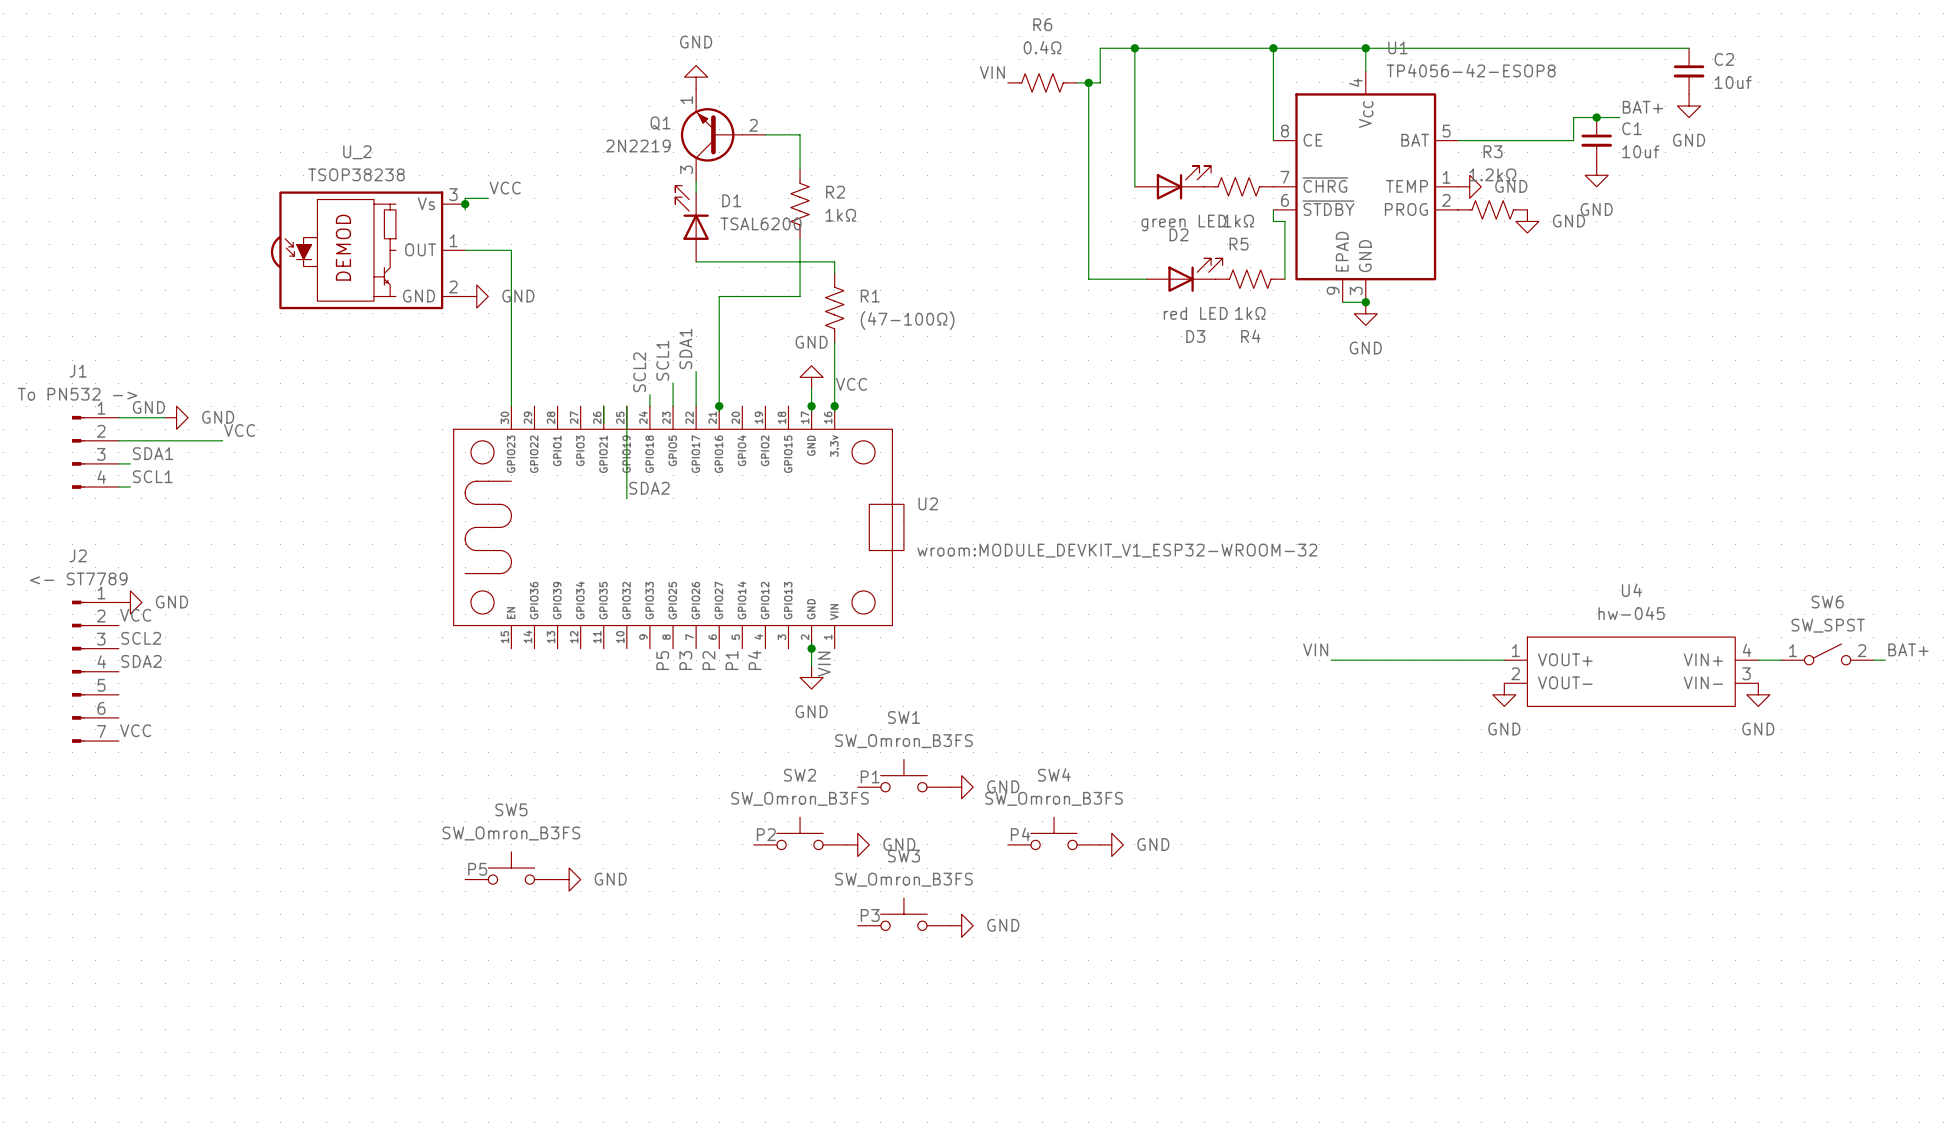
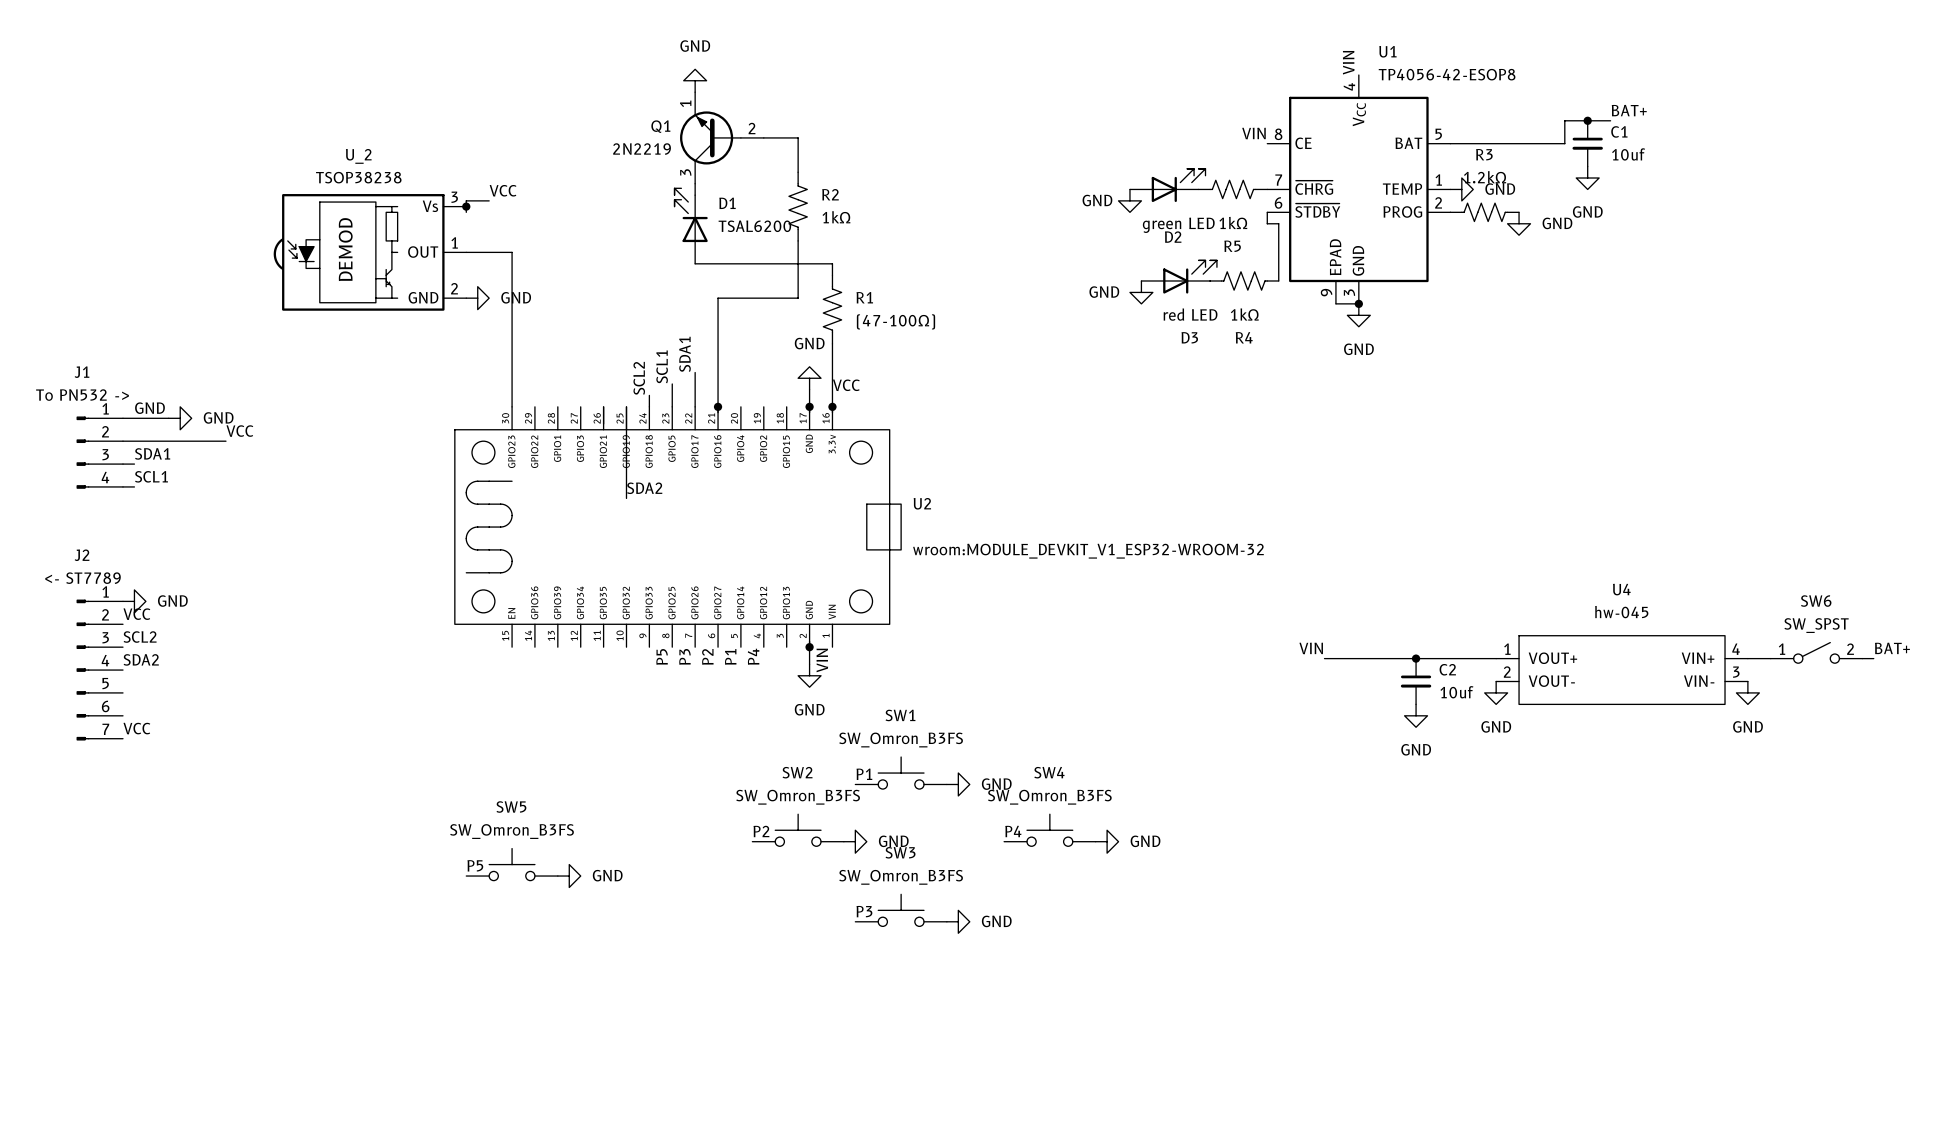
wire: (1134, 48) (1134, 186) -> none
junction: (1134, 48) -> none
wire: (1273, 48) (1273, 140) -> none
junction: (1273, 48) -> none
wire: (1365, 48) (1365, 71) -> none
junction: (1365, 48) -> none
wire: (1689, 48) (1100, 48) (1100, 82) (1077, 82) -> none
label: none -> VIN (1348, 62)
C2 position: (1689, 71) -> (1416, 681)
label: VIN (992, 72) -> none
R6: 0.4Ω (1042, 82) -> none
wire: (1088, 82) (1088, 279) (1146, 279) -> none
junction: (1088, 82) -> none
power symbol: GND (1689, 106) -> none
label: none -> VIN (1253, 133)
power symbol: none -> GND (1129, 200)
power symbol: none -> GND (1141, 292)
junction: none -> (1416, 658)
power symbol: none -> GND (1416, 715)

